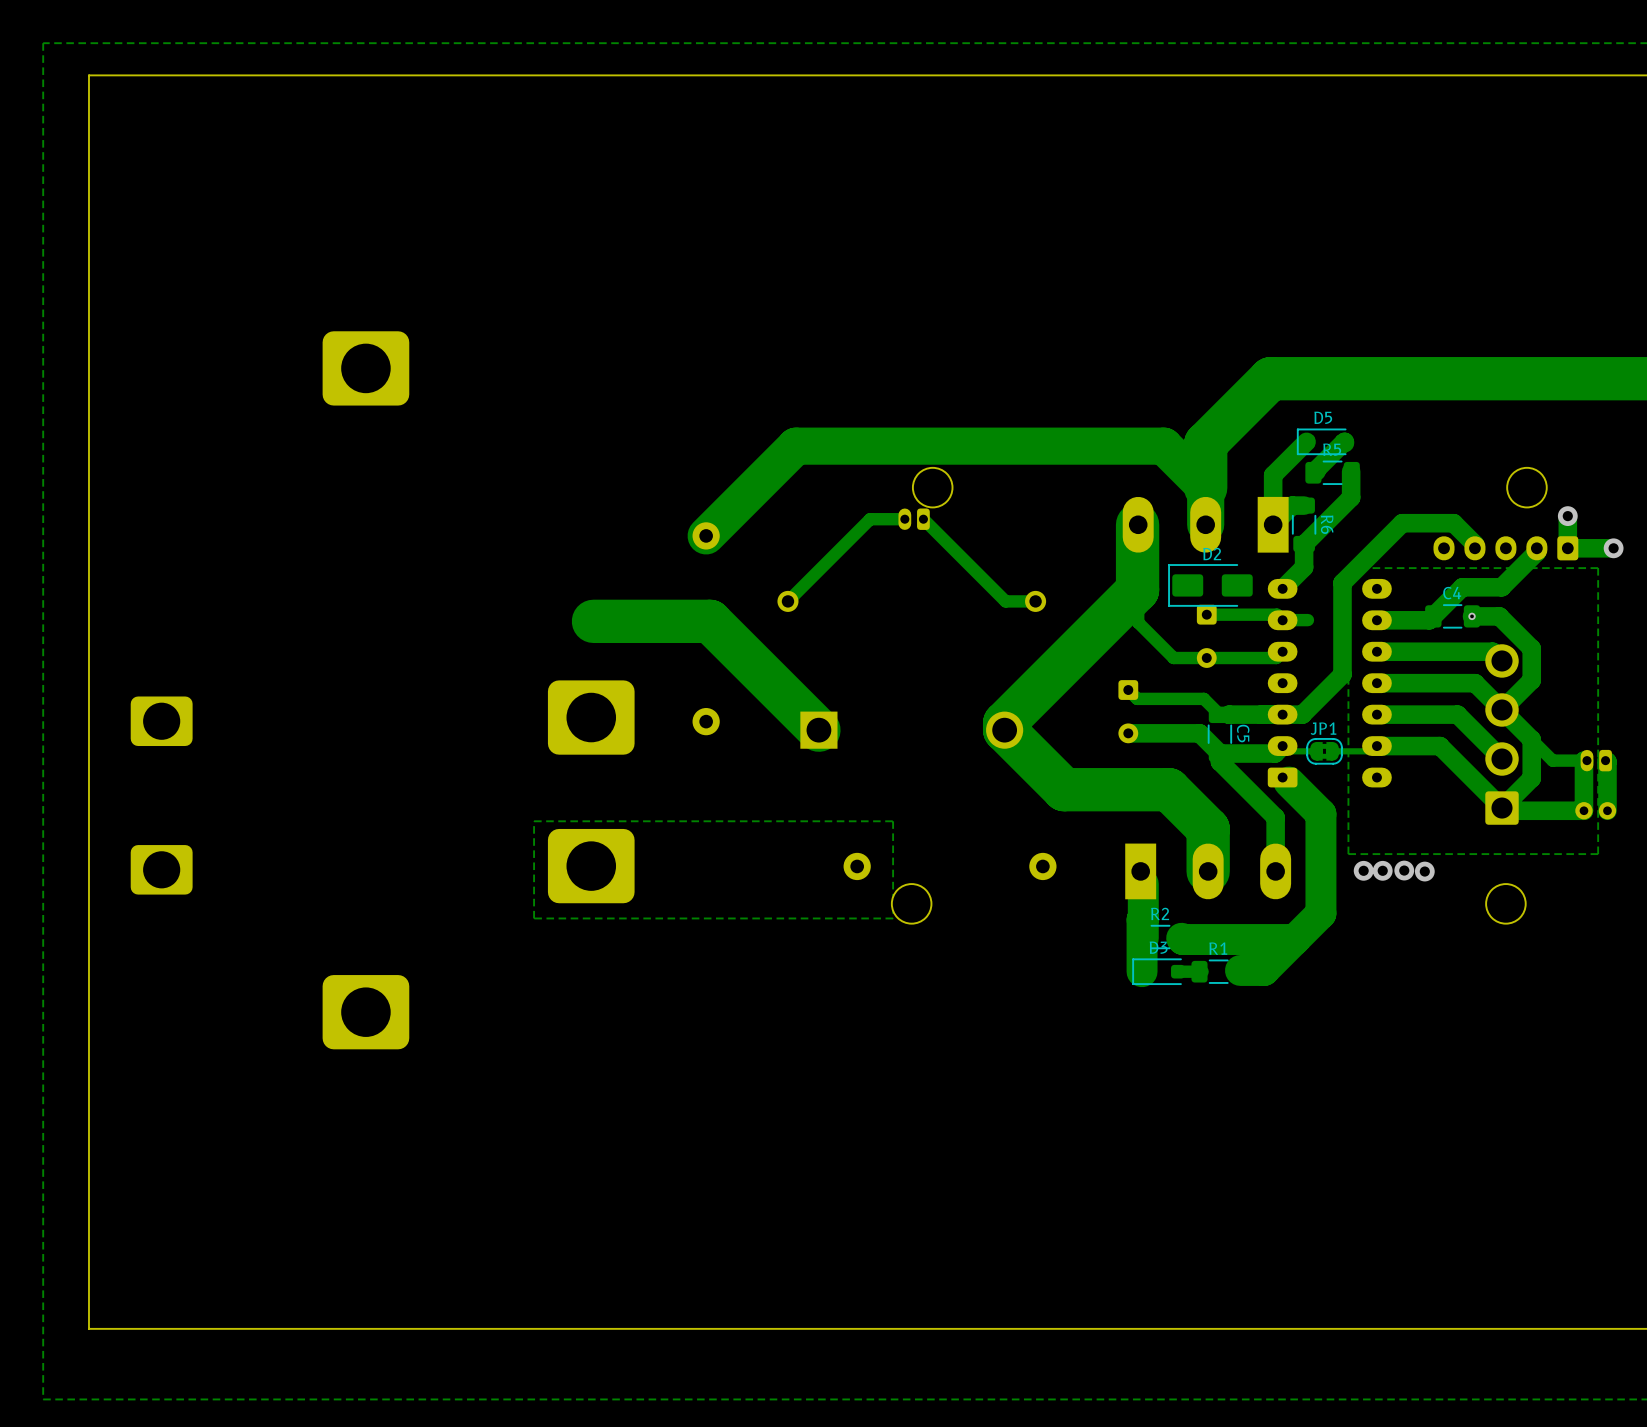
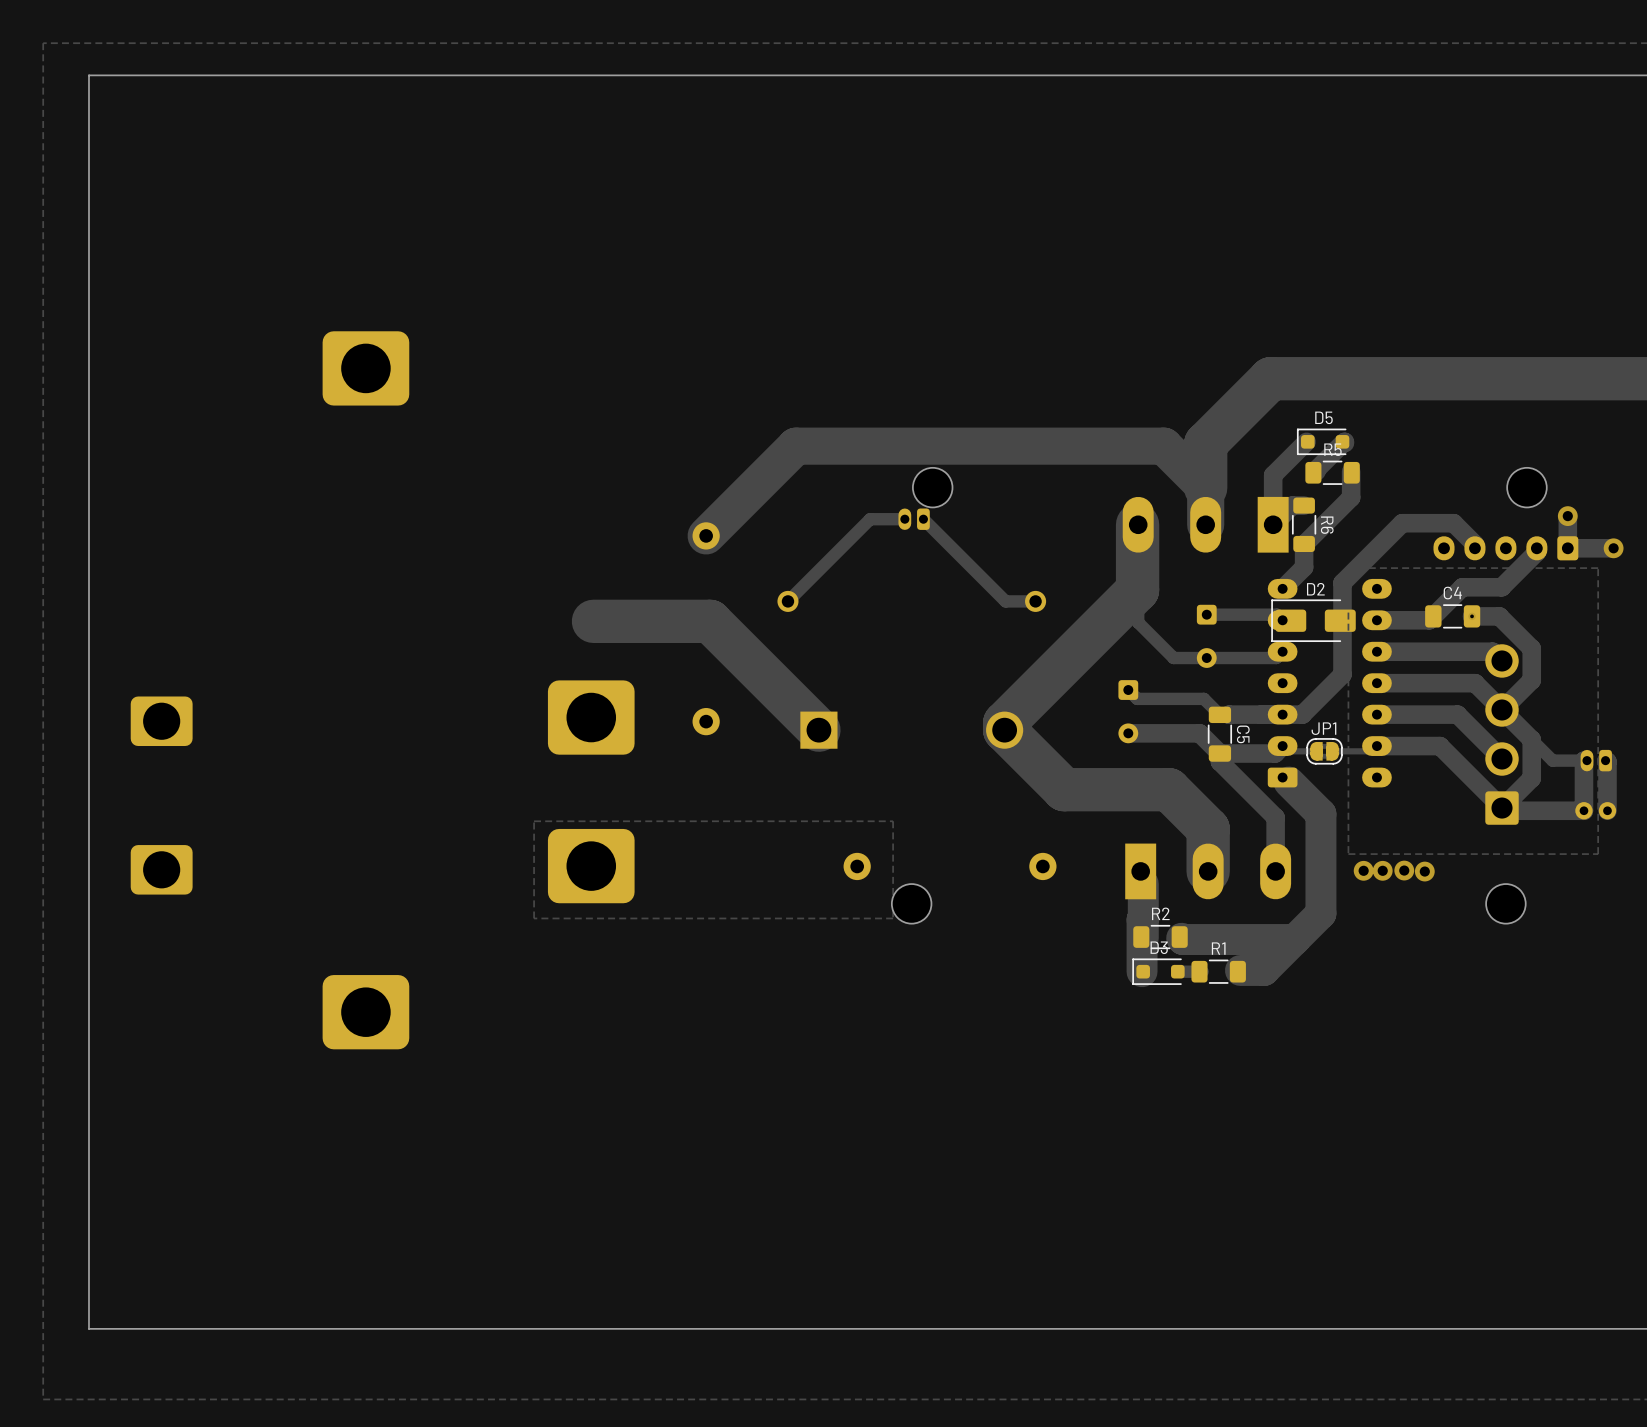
D2 position: (1210, 585) -> (1313, 620)
track: (1307, 620) (1282, 620) -> none

